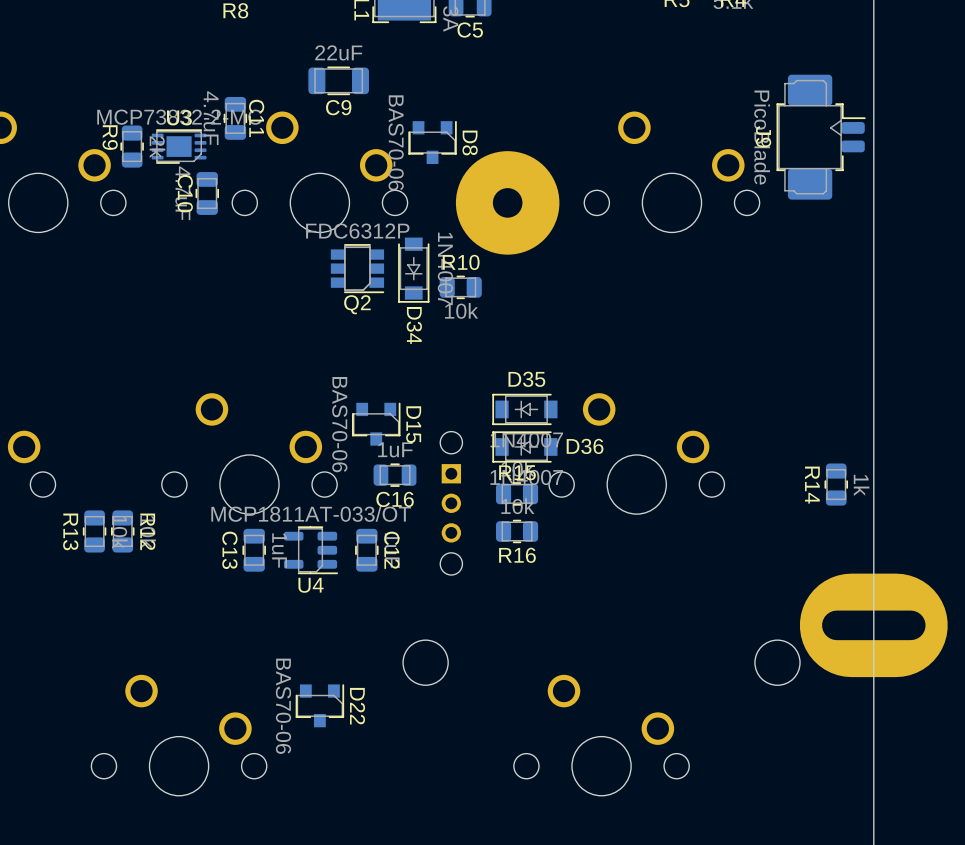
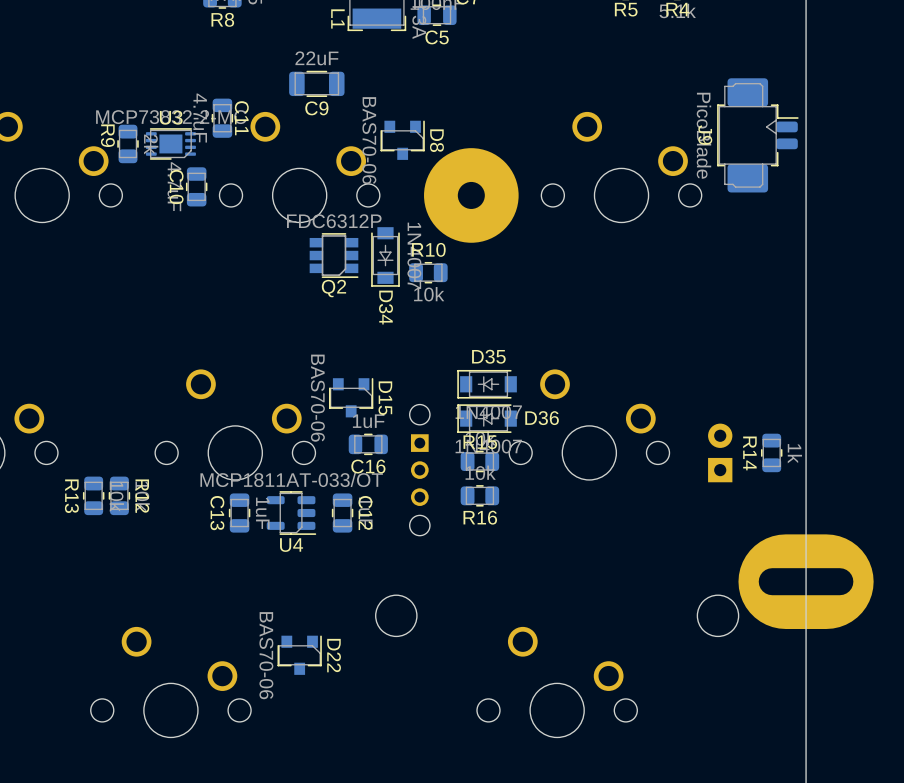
part: none -> (720, 452)

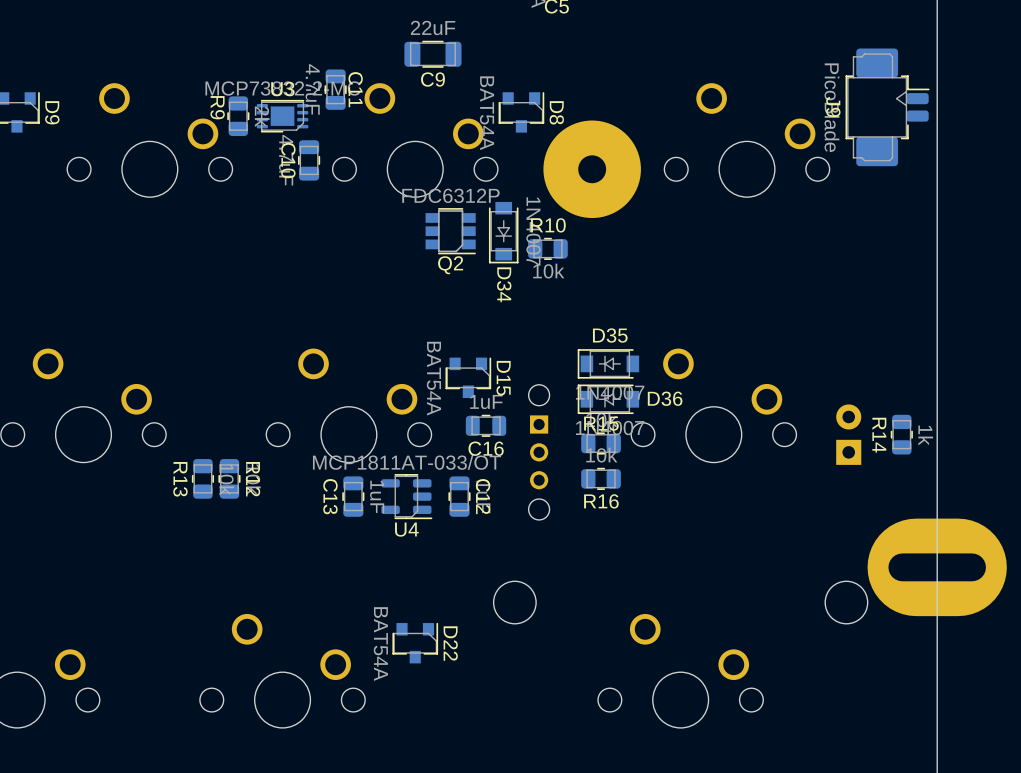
D8 value: BAS70-06 (369, 140) -> BAT54A (487, 113)
D15 value: BAS70-06 (317, 398) -> BAT54A (433, 378)
D22 value: BAS70-06 (266, 655) -> BAT54A (380, 644)

